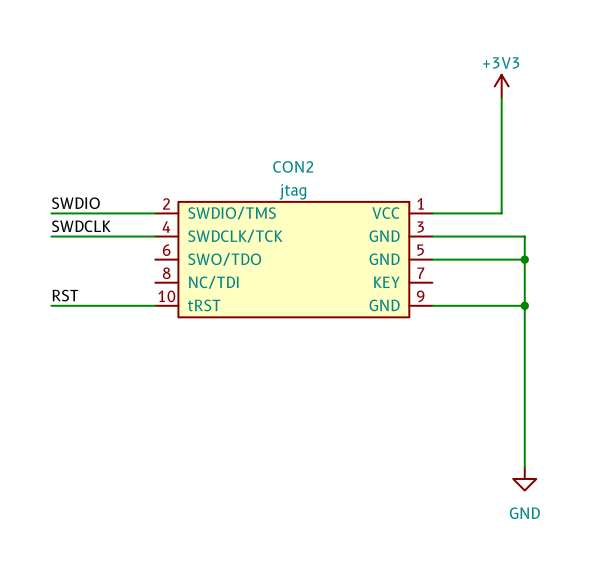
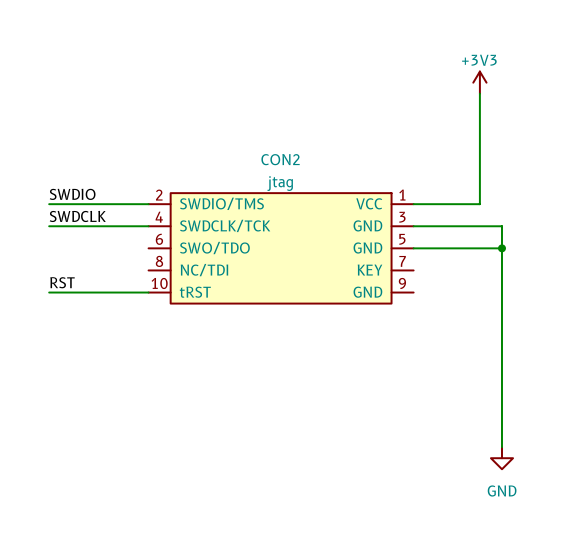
wire: (432, 305) (524, 305) -> none
junction: (524, 305) -> none

